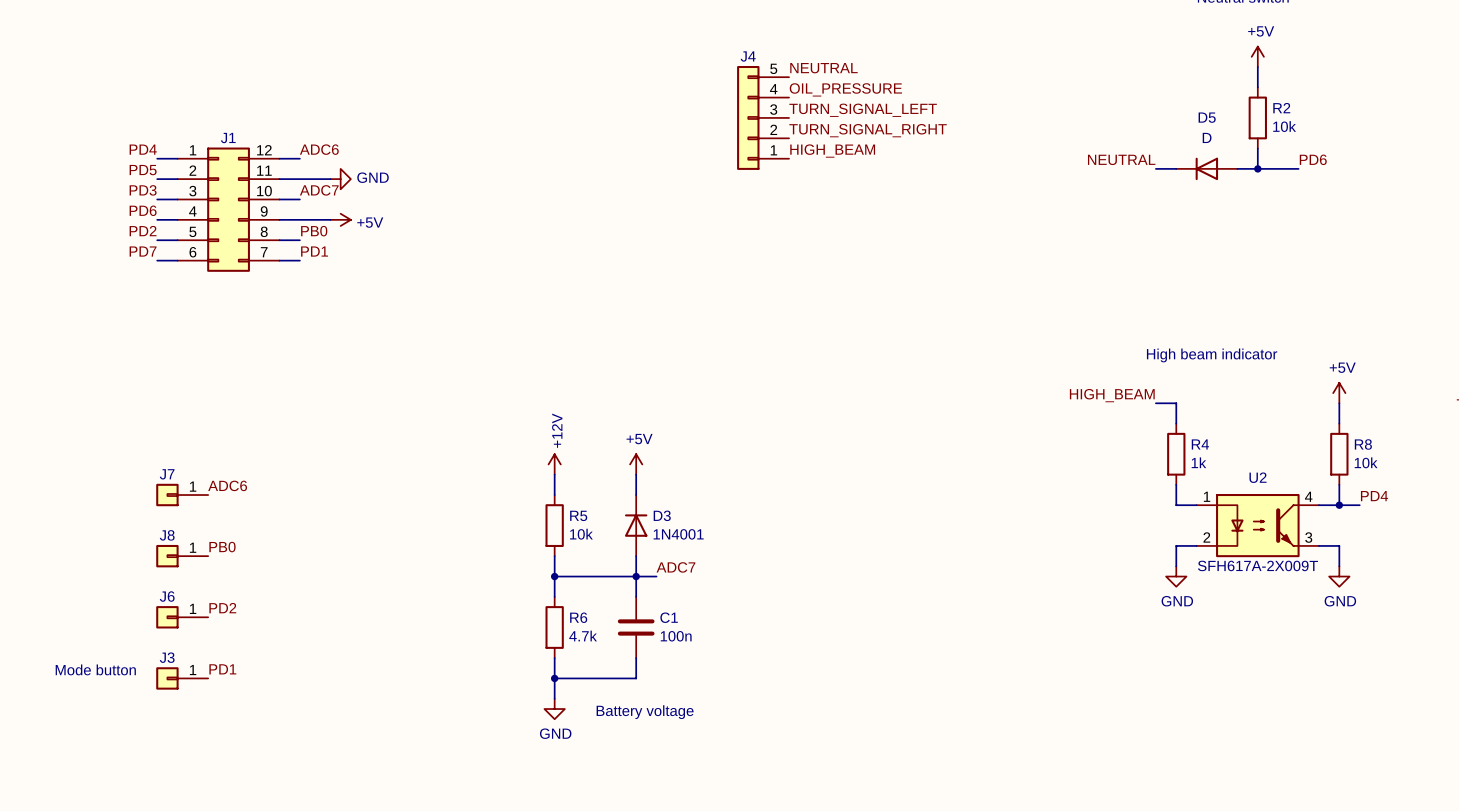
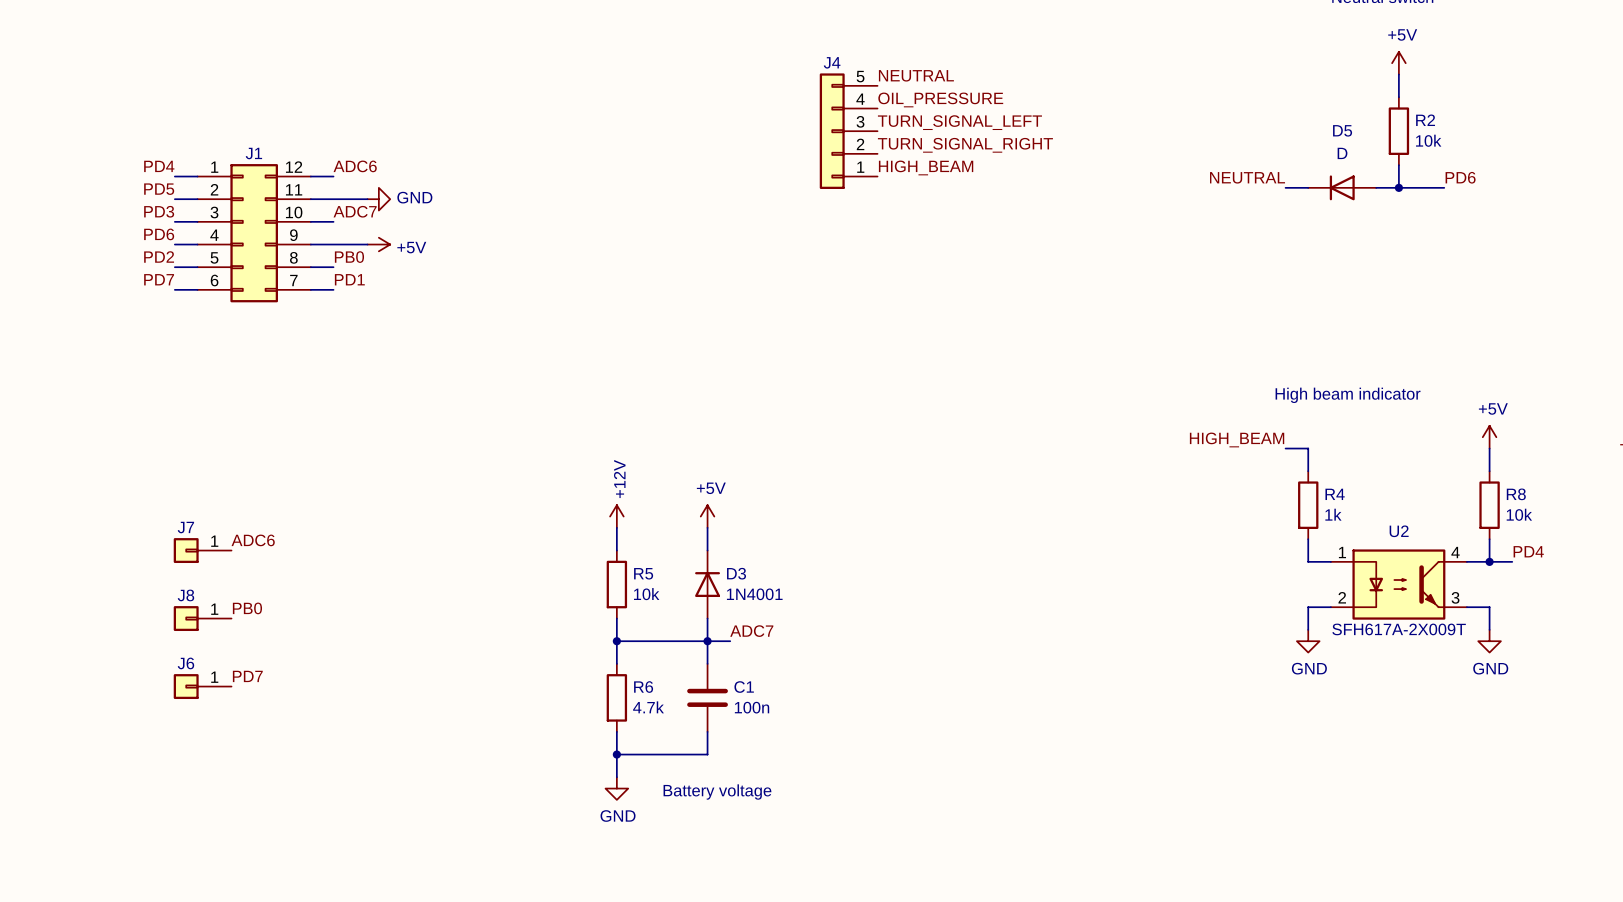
label: PD2 (222, 608) -> PD7 (247, 676)
text: Mode button (95, 669) -> none
label: PD1 (222, 669) -> none
J3: (182, 678) -> none

